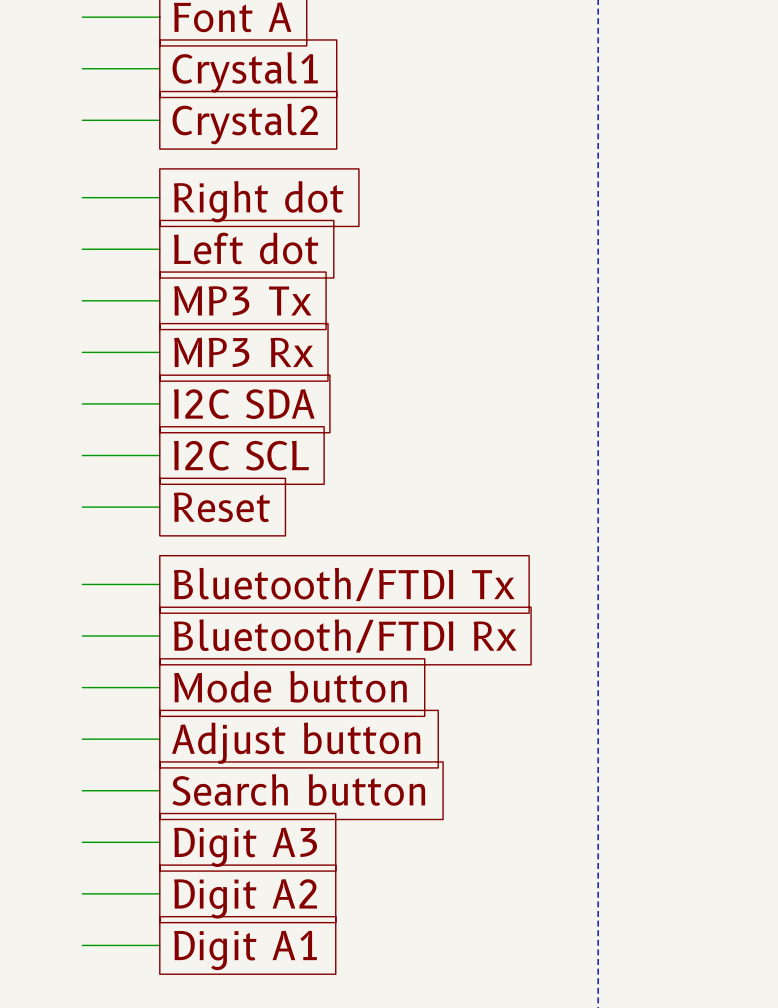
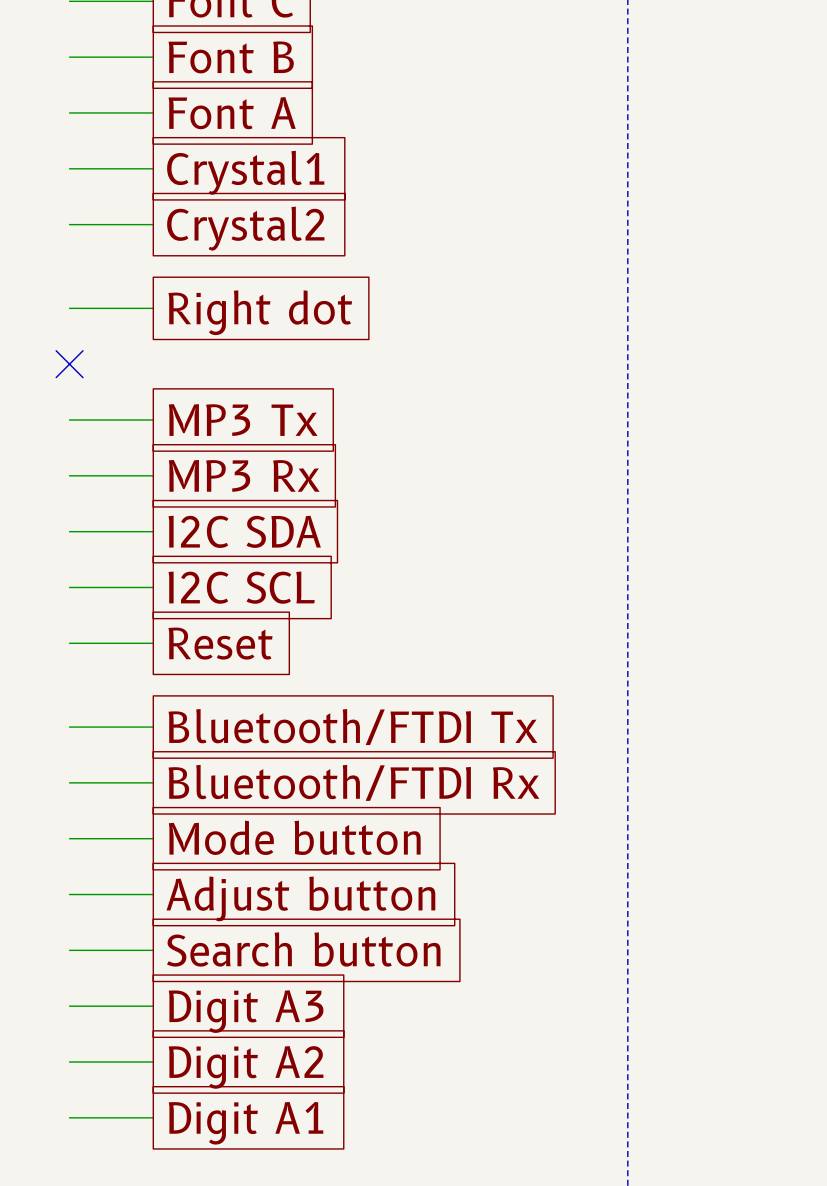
global label: Left dot (246, 248) -> none
wire: (82, 249) (159, 249) -> none
no-connect mark: none -> (69, 364)

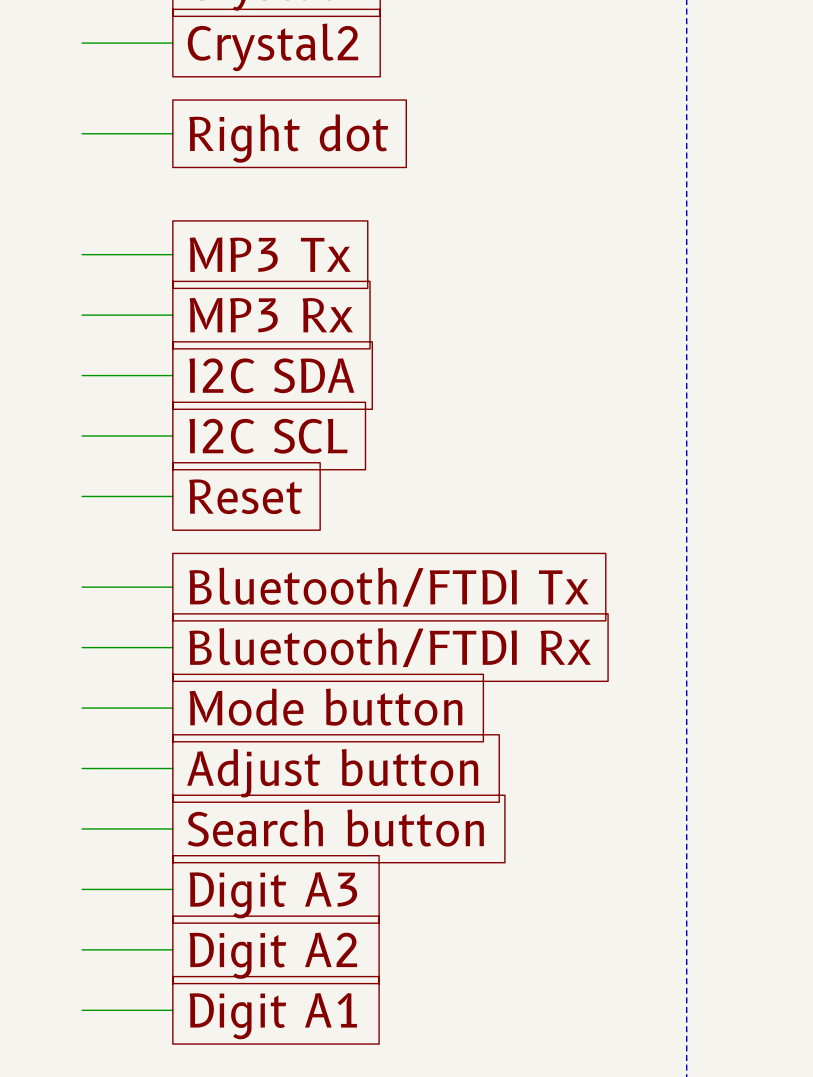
no-connect mark: (69, 364) -> none

